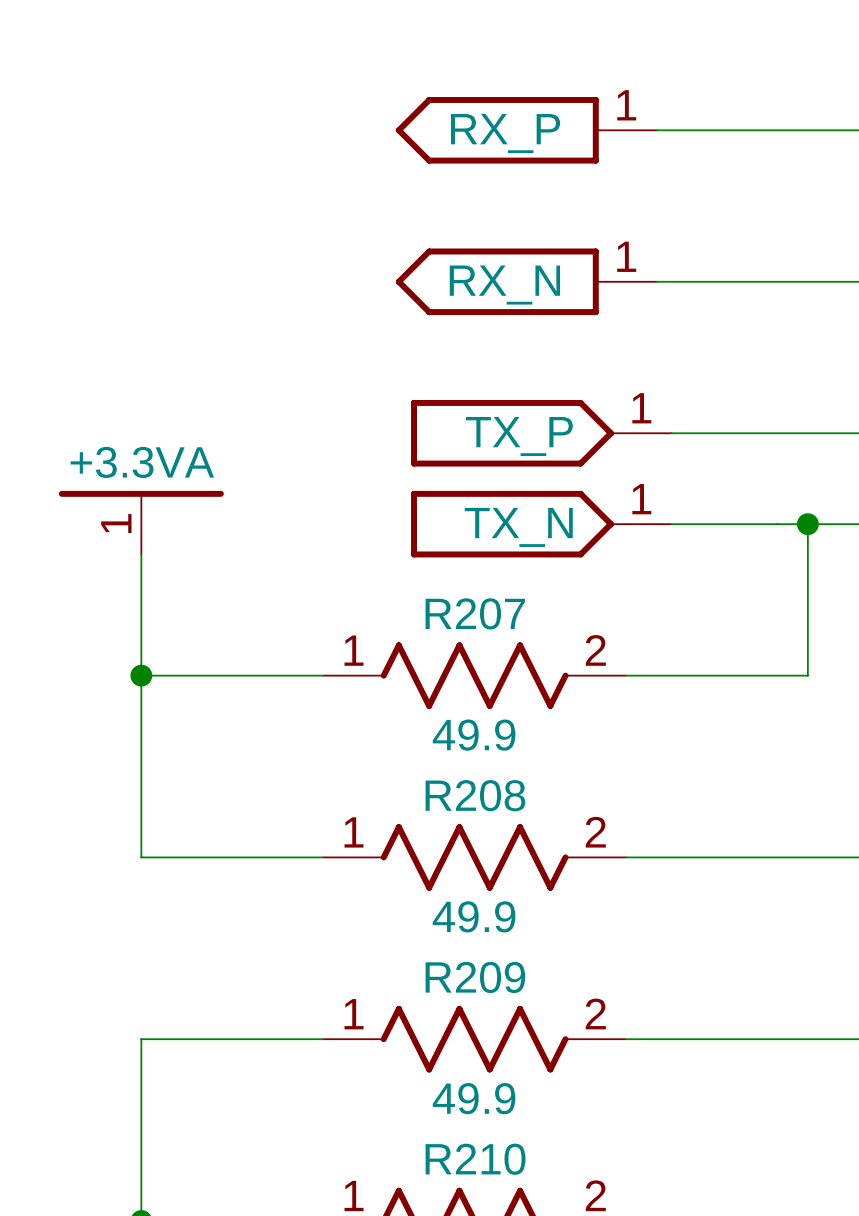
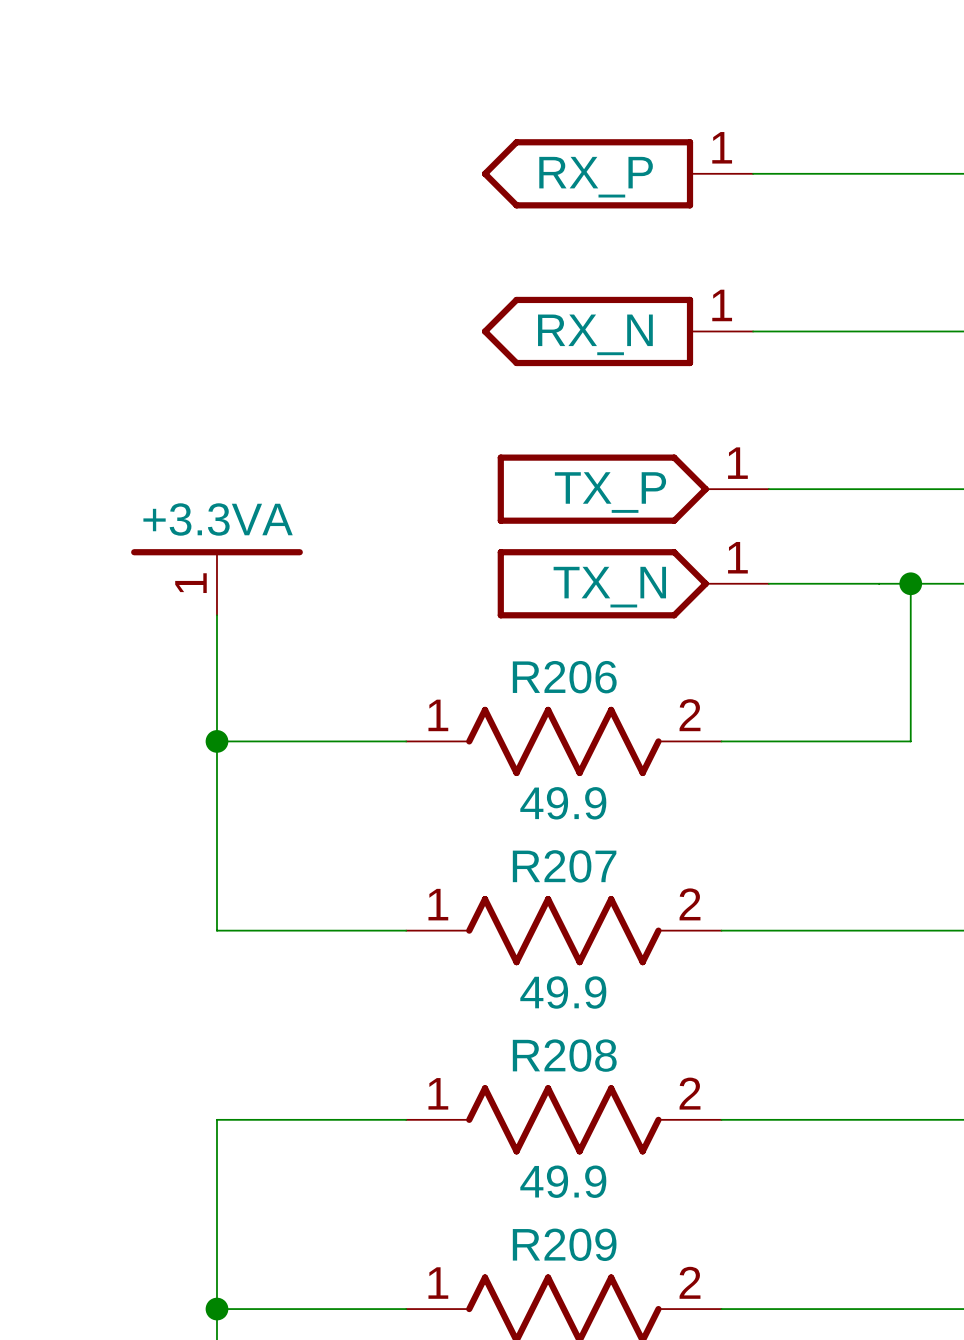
R207 name: R207 (475, 613) -> R206 (564, 677)
R208 name: R208 (475, 795) -> R207 (564, 866)
R209 name: R209 (475, 977) -> R208 (564, 1055)
R210 name: R210 (475, 1159) -> R209 (564, 1244)

